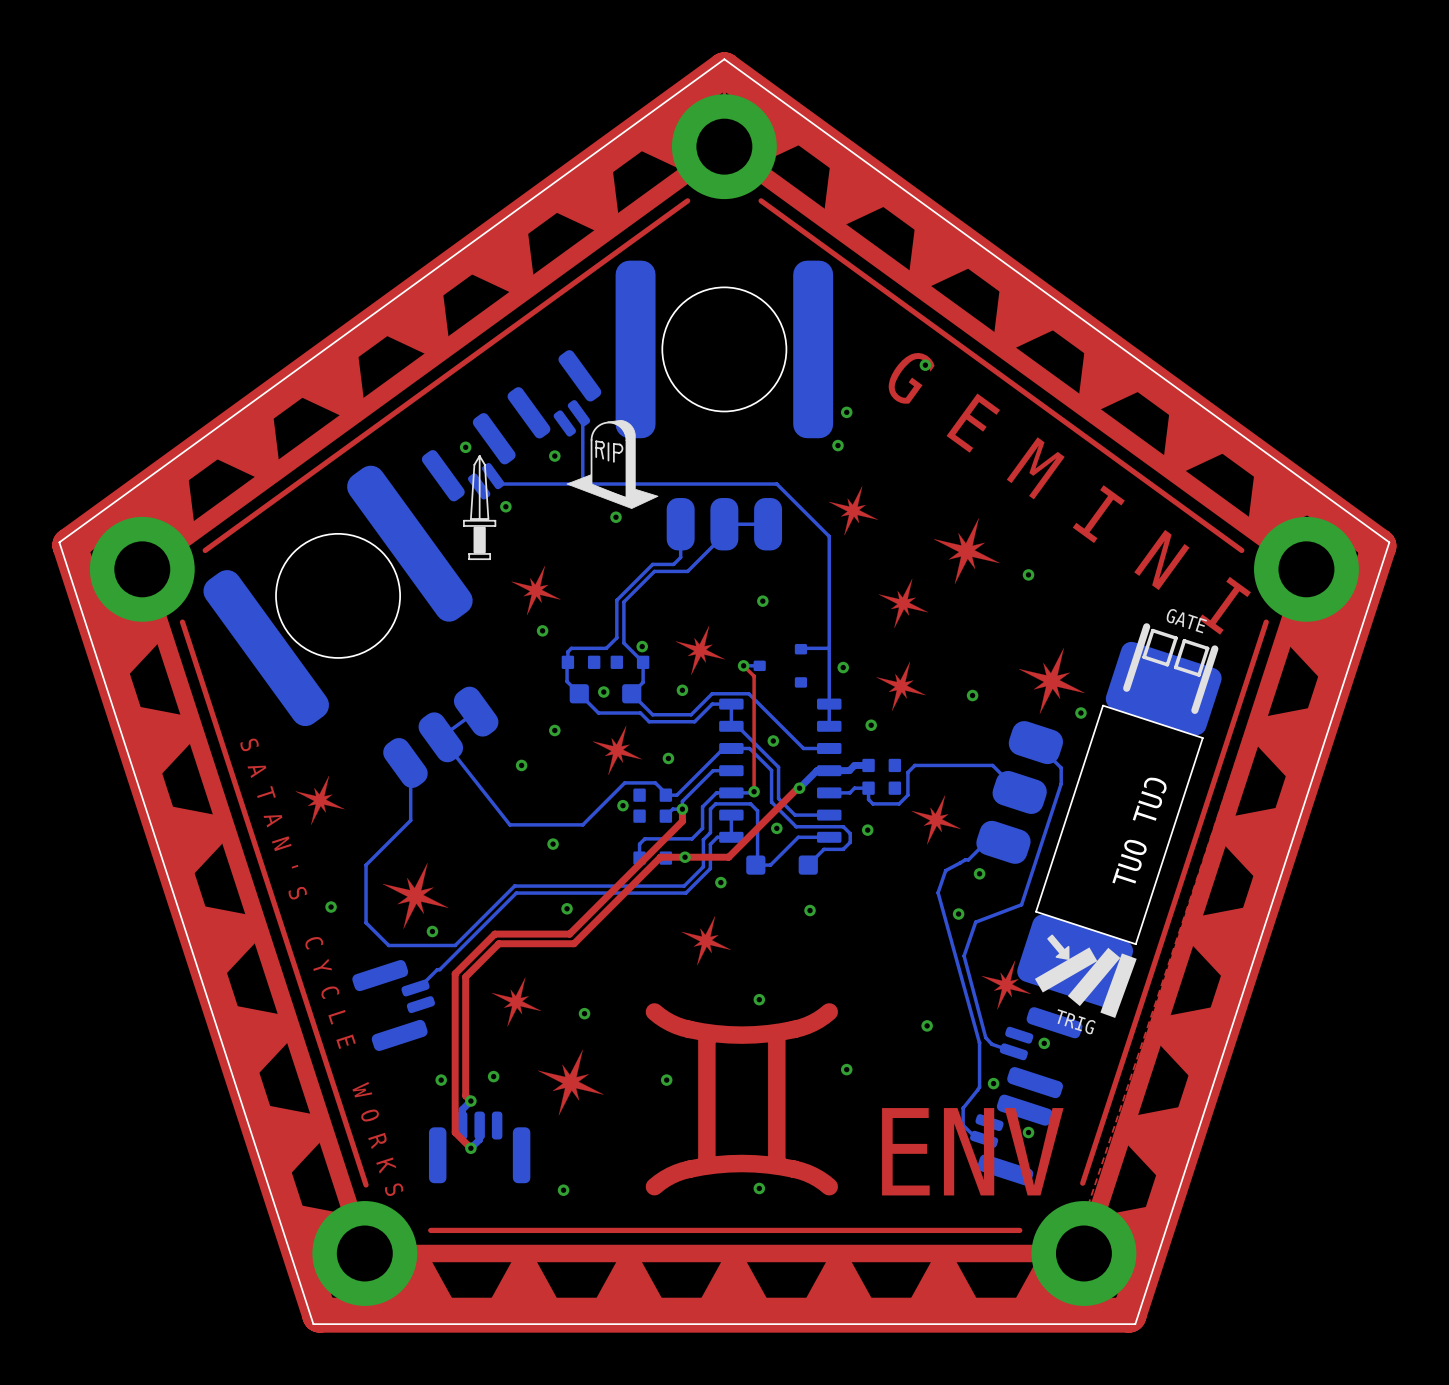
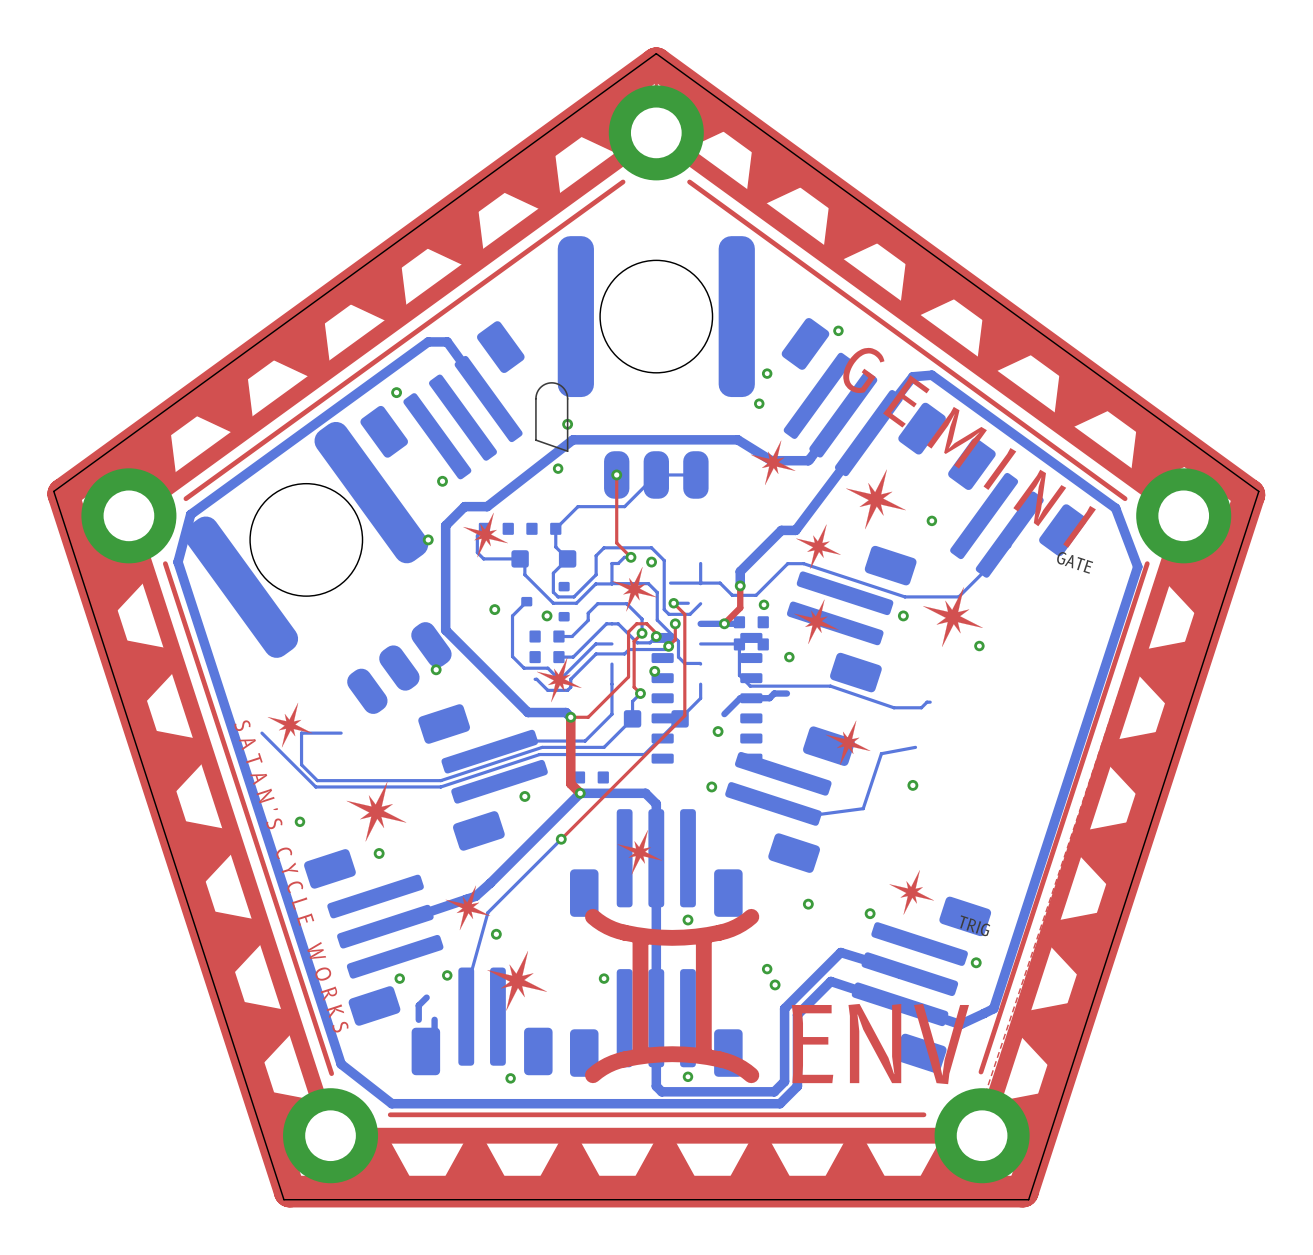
part: (554, 394) -> none
bottom track: (578, 413) (582, 417) (582, 484) -> none
drawing: [566, 419, 659, 509] -> none
via: none -> (396, 392)
part: none -> (863, 397)
bottom track: none -> (488, 399) (447, 341) (428, 341) (190, 514) (178, 562) (341, 1064) (391, 1103) (780, 1103) (797, 1086) (797, 1014) (830, 981) (960, 1024) (993, 1008) (1137, 566) (1115, 508) (931, 375) (912, 376) (795, 530) (781, 530) (740, 571) (740, 585)
part: none -> (442, 400)
line: (608, 443) (608, 460) -> none
via: (465, 447) -> none
line: (596, 447) (601, 448) -> none
line: (601, 448) (603, 458) -> none
line: (601, 448) (603, 446) (603, 443) (596, 441) (596, 457) -> none
line: (613, 452) (619, 452) (621, 451) (621, 445) (613, 443) (613, 461) -> none
line: (479, 456) (474, 464) (470, 518) (488, 518) (484, 464) (479, 456) -> none
line: (479, 456) (479, 518) -> none
via: (554, 456) -> none
part: (468, 457) -> none
bottom track: none -> (843, 414) (808, 460) (771, 460) (737, 439) (573, 439) (487, 506) (464, 506) (445, 525) (445, 630) (528, 712) (566, 712) (570, 717)
via: none -> (567, 424)
bottom track: (493, 476) (499, 484) (776, 484) (829, 536) (829, 726) -> none
via: (505, 506) -> none
line: (463, 520) (495, 520) (495, 525) (463, 525) (463, 520) -> none
bottom track: (680, 524) (680, 557) (673, 564) (652, 564) (616, 600) (616, 637) (606, 648) (571, 648) (567, 651) (567, 681) (598, 713) (640, 713) (649, 721) (657, 721) -> (535, 679) (547, 690) (567, 690) (570, 687) (570, 679) (596, 653)
top track: none -> (616, 474) (616, 543) (630, 557)
via: none -> (616, 474)
bottom track: (724, 524) (724, 534) (687, 571) (654, 571) (623, 601) (623, 643) (643, 662) (643, 682) (631, 693) (652, 714) (691, 714) (712, 693) (748, 693) (803, 748) (829, 748) -> (656, 474) (624, 506) (577, 506) (555, 528) (555, 547) (567, 558) (553, 573) (553, 592) (558, 596) (573, 596) (596, 574) (596, 555) (604, 547) (651, 547) (664, 560) (664, 609) (668, 614) (690, 614) (700, 603)
drawing: [473, 526, 486, 554] -> none
via: none -> (442, 481)
line: (469, 553) (490, 553) (490, 559) (469, 559) (469, 553) -> none
part: none -> (1017, 507)
bottom track: none -> (484, 528) (477, 535) (477, 552) (483, 558) (520, 558) (524, 563) (524, 574) (553, 603) (576, 603) (595, 583) (611, 583) (611, 563) (618, 563) (624, 557) (630, 557)
part: none -> (496, 528)
part: none -> (543, 528)
bottom track: none -> (1009, 534) (1009, 545) (958, 596) (904, 596) (803, 563) (787, 563) (756, 595) (732, 595) (720, 583) (670, 583)
via: none -> (428, 539)
via: (762, 601) -> none
via: none -> (630, 557)
part: none -> (543, 558)
via: none -> (651, 562)
bottom track: none -> (700, 563) (700, 583)
line: (1146, 626) (1126, 688) -> none
via: (542, 630) -> none
line: (1152, 630) (1176, 638) (1167, 664) (1144, 657) (1152, 630) -> none
line: (1184, 640) (1175, 667) (1198, 675) (1207, 648) (1184, 640) -> none
bottom track: none -> (611, 583) (648, 583) (657, 592) (657, 620) (678, 641) (678, 657) (684, 663) (700, 664)
via: (642, 646) -> none
top track: none -> (740, 585) (740, 607) (724, 623)
via: none -> (740, 585)
bottom track: (829, 648) (800, 649) -> none
line: (1214, 648) (1194, 710) -> none
part: (581, 662) -> none
part: (629, 662) -> none
bottom track: none -> (526, 601) (512, 615) (512, 656) (524, 668) (547, 668) (560, 679) (595, 643) (611, 643)
part position: (780, 665) -> (545, 601)
via: none -> (494, 609)
top track: (754, 676) (754, 791) -> (683, 612) (684, 614) (684, 715) (561, 839)
via: none -> (547, 615)
via: none -> (903, 615)
part: none -> (851, 619)
part footprint: [569, 684, 642, 704] -> [529, 630, 565, 643]
part: none -> (751, 622)
top track: none -> (675, 623) (675, 639) (668, 646)
via: none -> (675, 623)
bottom track: none -> (700, 623) (737, 623)
via: none -> (724, 623)
via: (682, 690) -> none
via: (603, 692) -> none
via: (972, 695) -> none
bottom track: none -> (642, 633) (642, 619) (626, 603) (597, 603) (588, 613) (588, 620) (572, 636) (558, 636)
top track: none -> (642, 633) (634, 641) (634, 687) (640, 693)
via: none -> (642, 633)
bottom track: none -> (656, 636) (649, 642) (637, 642) (618, 623) (606, 623) (573, 657) (558, 657)
top track: none -> (656, 636) (656, 633) (646, 623) (636, 623) (628, 631) (628, 676) (588, 717) (570, 717) (570, 783) (580, 793)
via: none -> (656, 636)
bottom track: none -> (700, 643) (738, 643) (739, 675) (750, 686) (830, 686) (893, 707) (921, 707) (927, 702) (930, 702)
bottom track: (476, 711) (440, 737) (509, 824) (582, 824) (624, 782) (655, 782) (665, 795) (676, 795) (723, 748) (749, 748) (771, 770) (771, 802) (796, 826) (843, 826) (850, 833) (850, 842) (843, 849) (824, 849) (808, 865) -> none
part: none -> (751, 644)
via: none -> (668, 646)
bottom track: (689, 721) (694, 721) (712, 704) (731, 704) (731, 726) (737, 726) (778, 767) (778, 798) (794, 815) (829, 815) -> (624, 653) (629, 649) (665, 649) (668, 646)
part: none -> (547, 657)
via: (554, 730) -> none
bottom track: none -> (611, 664) (611, 714) (585, 741) (506, 741) (496, 751) (489, 751)
via: none -> (436, 669)
via: none -> (654, 671)
via: (773, 740) -> none
bottom track: (1035, 742) (1061, 767) (1061, 783) (1021, 904) (975, 922) (964, 955) (985, 1037) (991, 1044) (1013, 1051) -> none
bottom track: none -> (700, 684) (700, 698) (644, 754) (539, 754) (440, 786) (315, 786) (261, 733)
via: (668, 758) -> none
bottom track: (405, 762) (405, 775) (410, 780) (410, 820) (366, 865) (366, 922) (388, 945) (455, 945) (514, 885) -> none
via: (521, 765) -> none
bottom track: none -> (640, 693) (632, 701) (632, 718) (604, 747) (542, 747) (440, 780) (317, 780) (301, 764) (301, 733) (341, 733)
via: none -> (640, 693)
part: (881, 765) -> none
bottom track: (731, 770) (713, 770) (682, 801) (682, 809) (672, 809) (665, 816) -> none
top track: (799, 788) (728, 857) (660, 857) (574, 943) (498, 943) (465, 976) (465, 1095) (470, 1101) -> none
via: (799, 788) -> none
part: (881, 788) -> none
via: none -> (570, 717)
bottom track: (754, 791) (716, 792) (702, 806) (702, 828) (692, 838) (644, 838) (639, 844) (639, 858) -> none
via: (754, 791) -> none
bottom track: (1019, 792) (992, 765) (914, 765) (907, 772) (907, 795) (899, 803) (872, 803) (868, 799) (868, 788) (854, 788) (849, 792) (829, 792) -> none
part: (652, 795) -> none
via: (622, 805) -> none
via: none -> (718, 731)
top track: (682, 809) (682, 821) (569, 934) (494, 934) (455, 973) (455, 1132) (470, 1148) -> none
via: (682, 809) -> none
bottom track: (731, 815) (731, 837) (717, 837) (710, 844) (710, 868) (685, 893) (516, 893) (439, 969) (437, 969) (419, 988) (415, 988) -> none
part: (652, 816) -> none
bottom track: none -> (915, 747) (881, 753) (863, 808) (799, 817) (786, 803) (773, 803)
part: (1098, 824) -> none
via: (776, 828) -> none
via: (867, 830) -> none
bottom track: (829, 837) (798, 837) (770, 865) (755, 865) (757, 863) (757, 810) (750, 803) (715, 803) (710, 809) (710, 832) (703, 839) (703, 866) (684, 886) (514, 886) -> none
bottom track: (1003, 842) (985, 842) (968, 859) (945, 870) (938, 892) (979, 1042) -> none
via: (553, 844) -> none
via: (685, 857) -> none
part: none -> (483, 777)
part position: (782, 865) -> (656, 718)
via: none -> (912, 785)
via: none -> (711, 786)
via: (979, 873) -> none
via: none -> (580, 793)
via: none -> (524, 796)
via: (720, 882) -> none
part: none -> (789, 799)
via: (567, 908) -> none
via: (810, 910) -> none
via: (958, 914) -> none
bottom track: none -> (561, 839) (487, 912) (466, 990) (466, 1016)
via: none -> (561, 839)
via: (432, 931) -> none
drawing: [1034, 934, 1137, 1018] -> none
via: none -> (379, 853)
part: none -> (656, 862)
via: none -> (808, 904)
via: (759, 999) -> none
part: (393, 1005) -> none
via: none -> (870, 913)
via: (584, 1013) -> none
via: none -> (687, 920)
bottom track: none -> (385, 926) (475, 896) (580, 793) (645, 793) (656, 804) (656, 1086) (661, 1091) (774, 1091) (784, 1081) (784, 1008) (840, 952) (895, 969) (900, 974) (909, 974)
via: (927, 1025) -> none
via: none -> (496, 934)
part: none -> (373, 937)
bottom track: (979, 1042) (979, 1087) (963, 1108) (963, 1125) (977, 1139) (984, 1139) -> none
via: (1044, 1043) -> none
part: (1041, 1052) -> none
via: none -> (976, 962)
via: (993, 1083) -> none
via: none -> (775, 984)
part: none -> (921, 984)
via: (470, 1101) -> none
part: none -> (482, 1021)
part: none -> (656, 1022)
via: (1028, 1132) -> none
part: (1011, 1140) -> none
part: (479, 1147) -> none
via: (470, 1148) -> none

